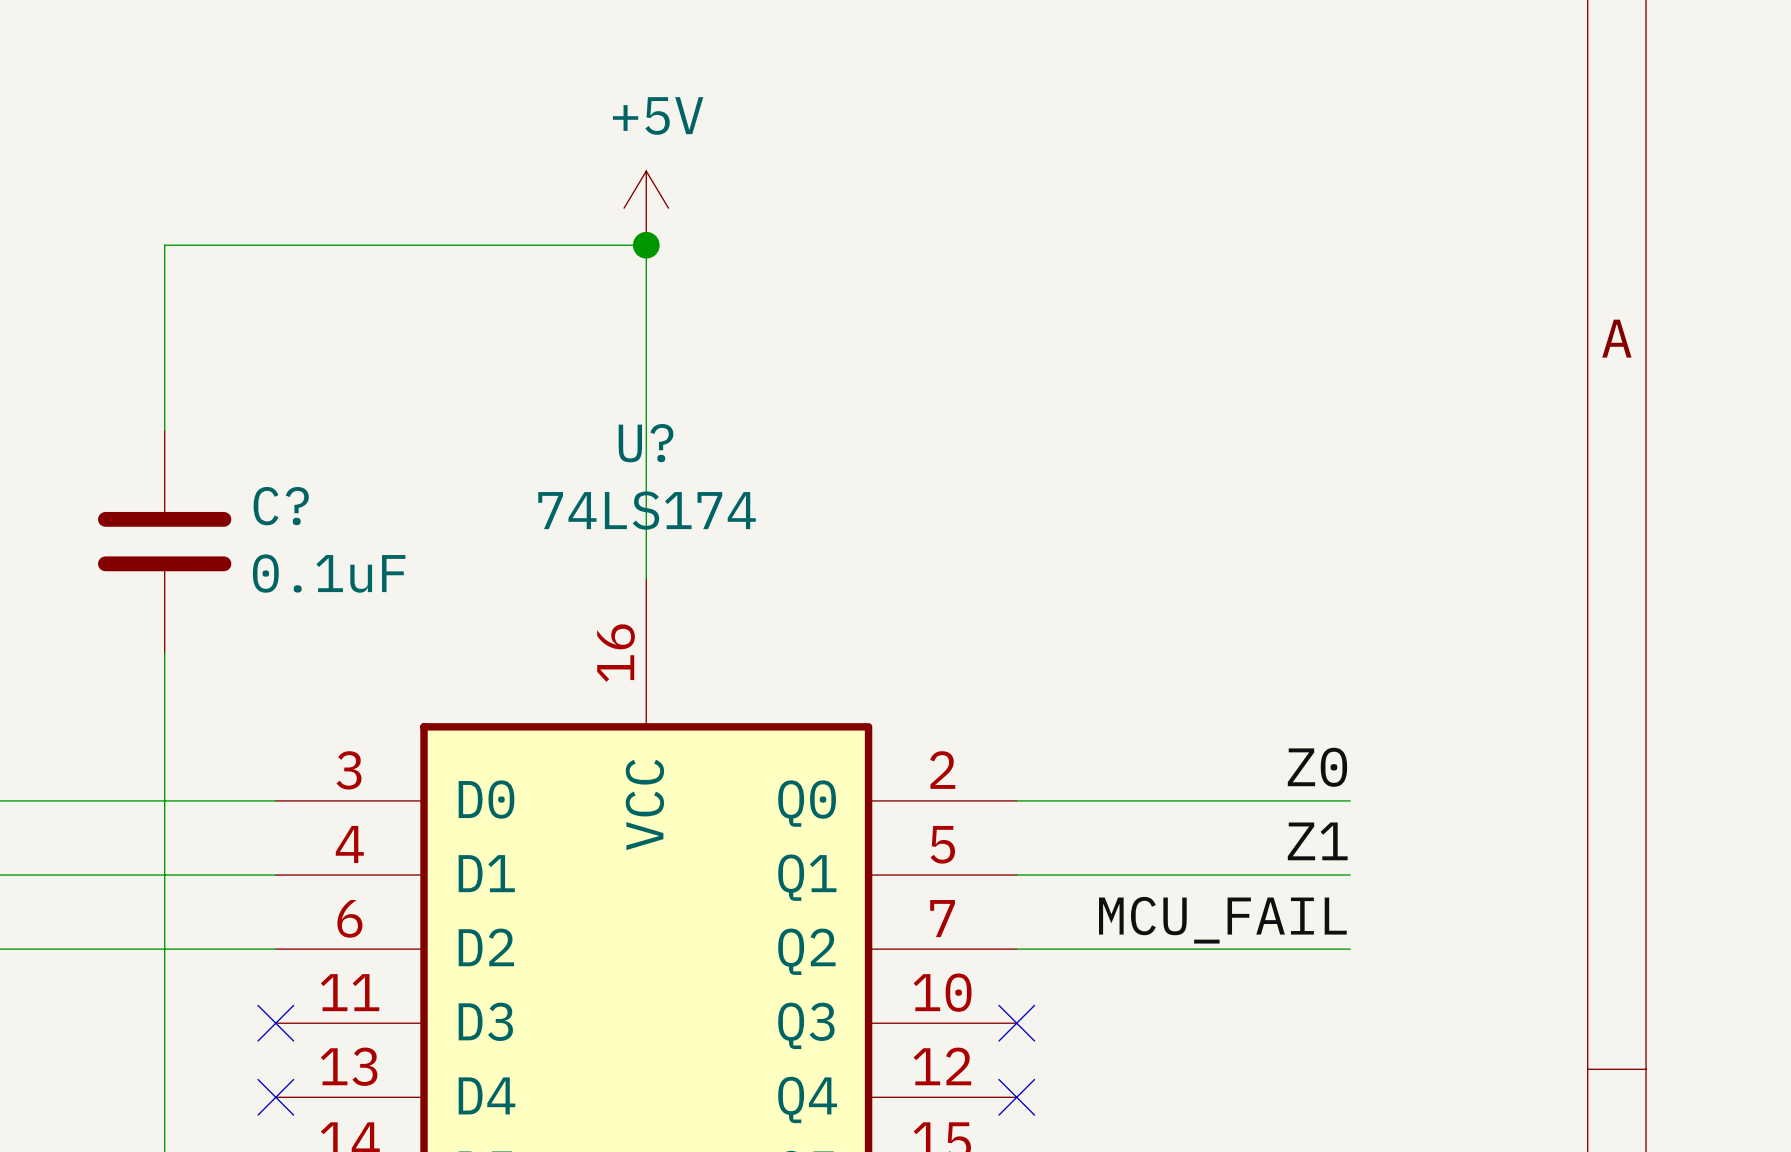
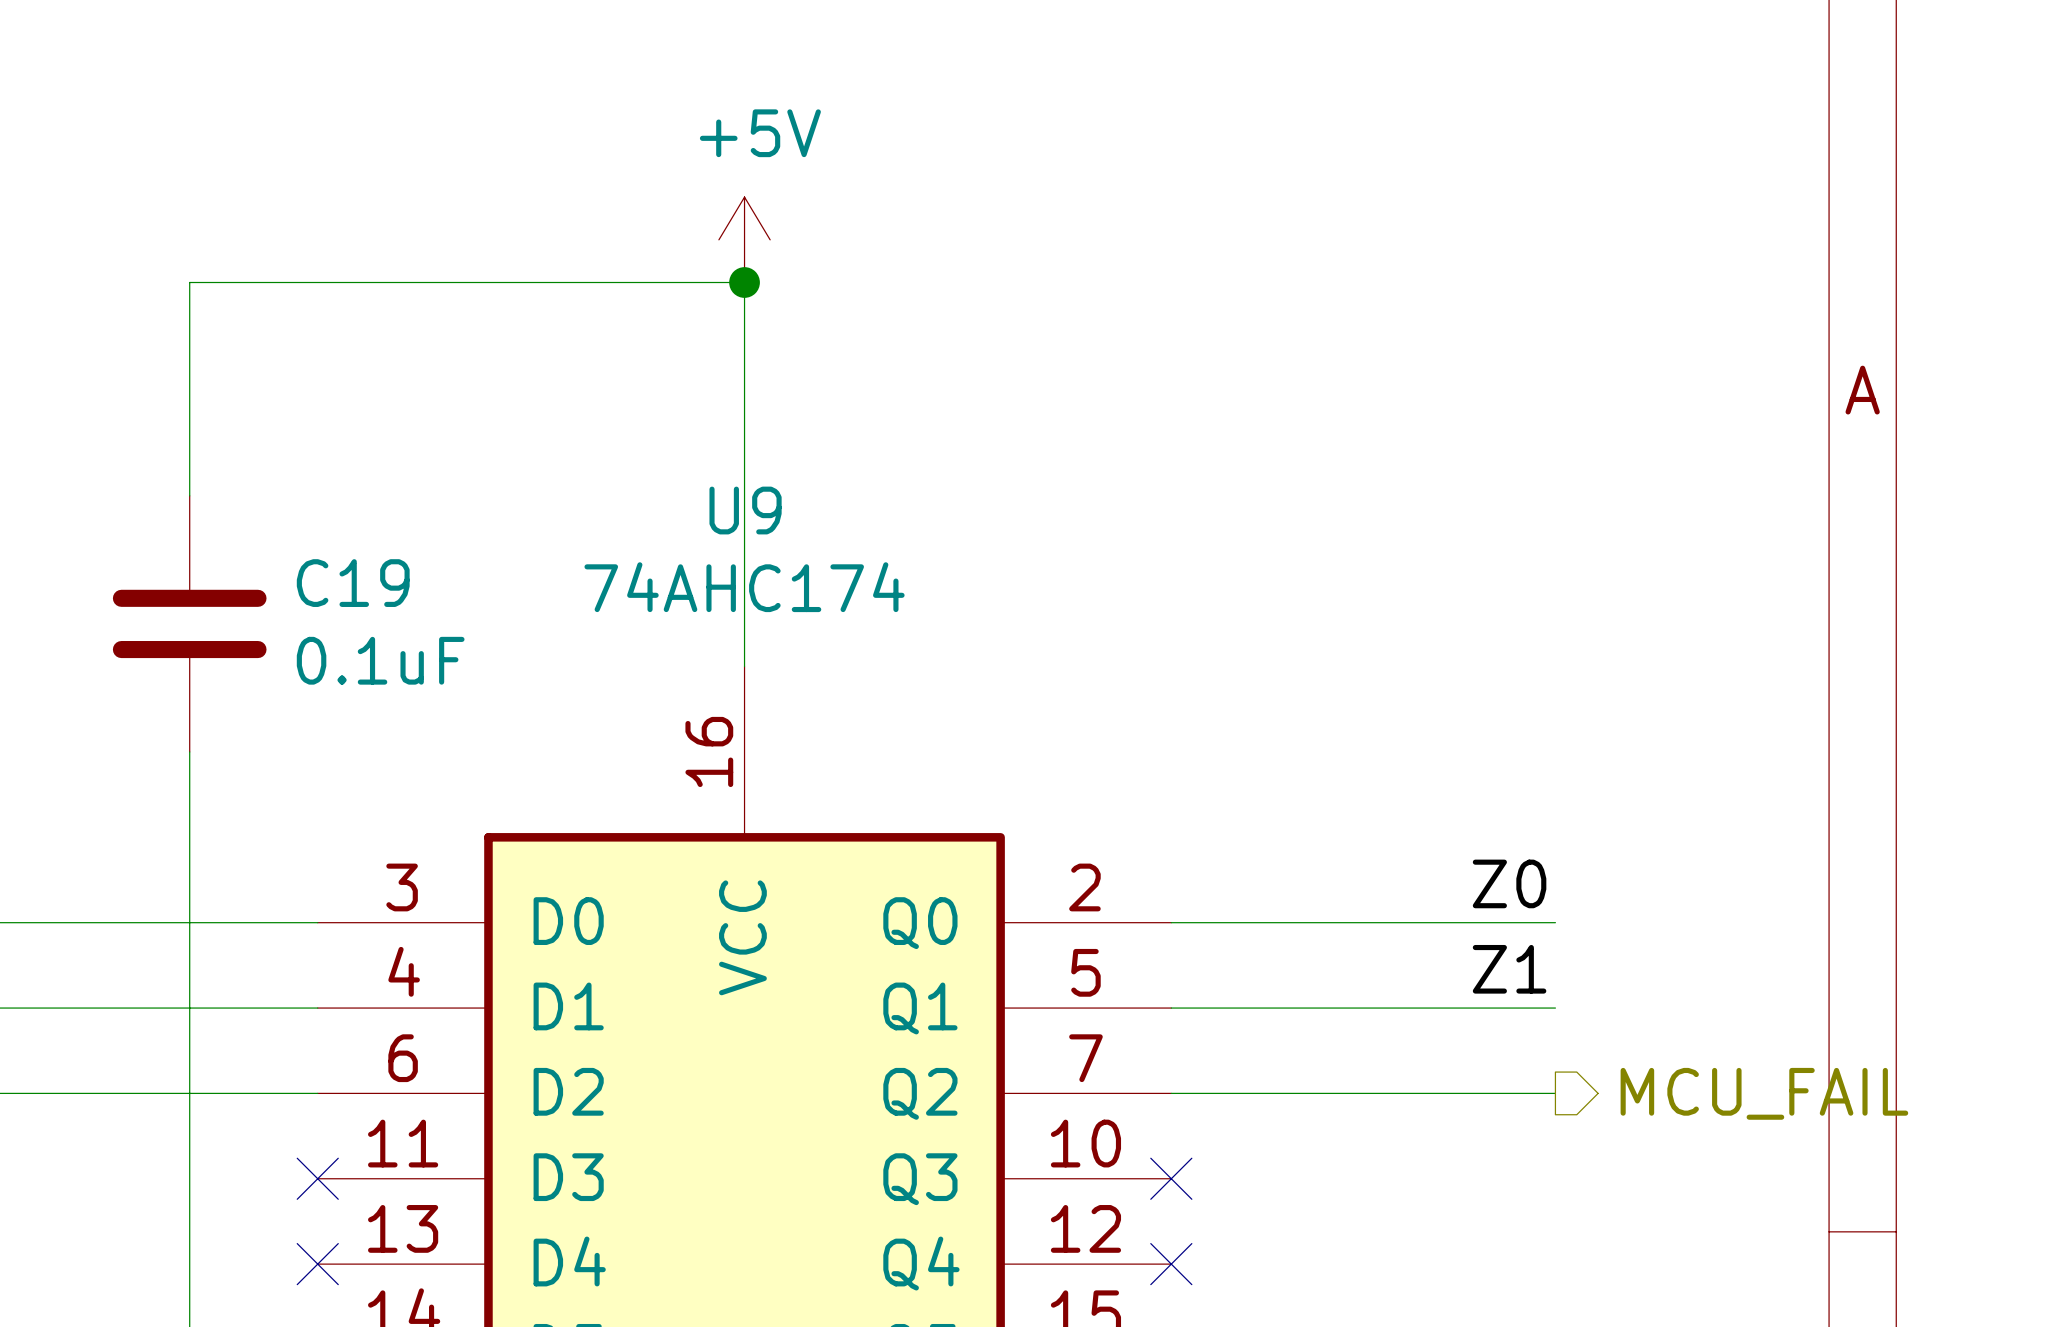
U? name: U? (646, 443) -> U9 (745, 510)
C? name: C? (281, 506) -> C19 (353, 583)
U? value: 74LS174 (647, 510) -> 74AHC174 (744, 587)
label: MCU_FAIL (1222, 920) -> none
hierarchical label: none -> MCU_FAIL (1764, 1093)

